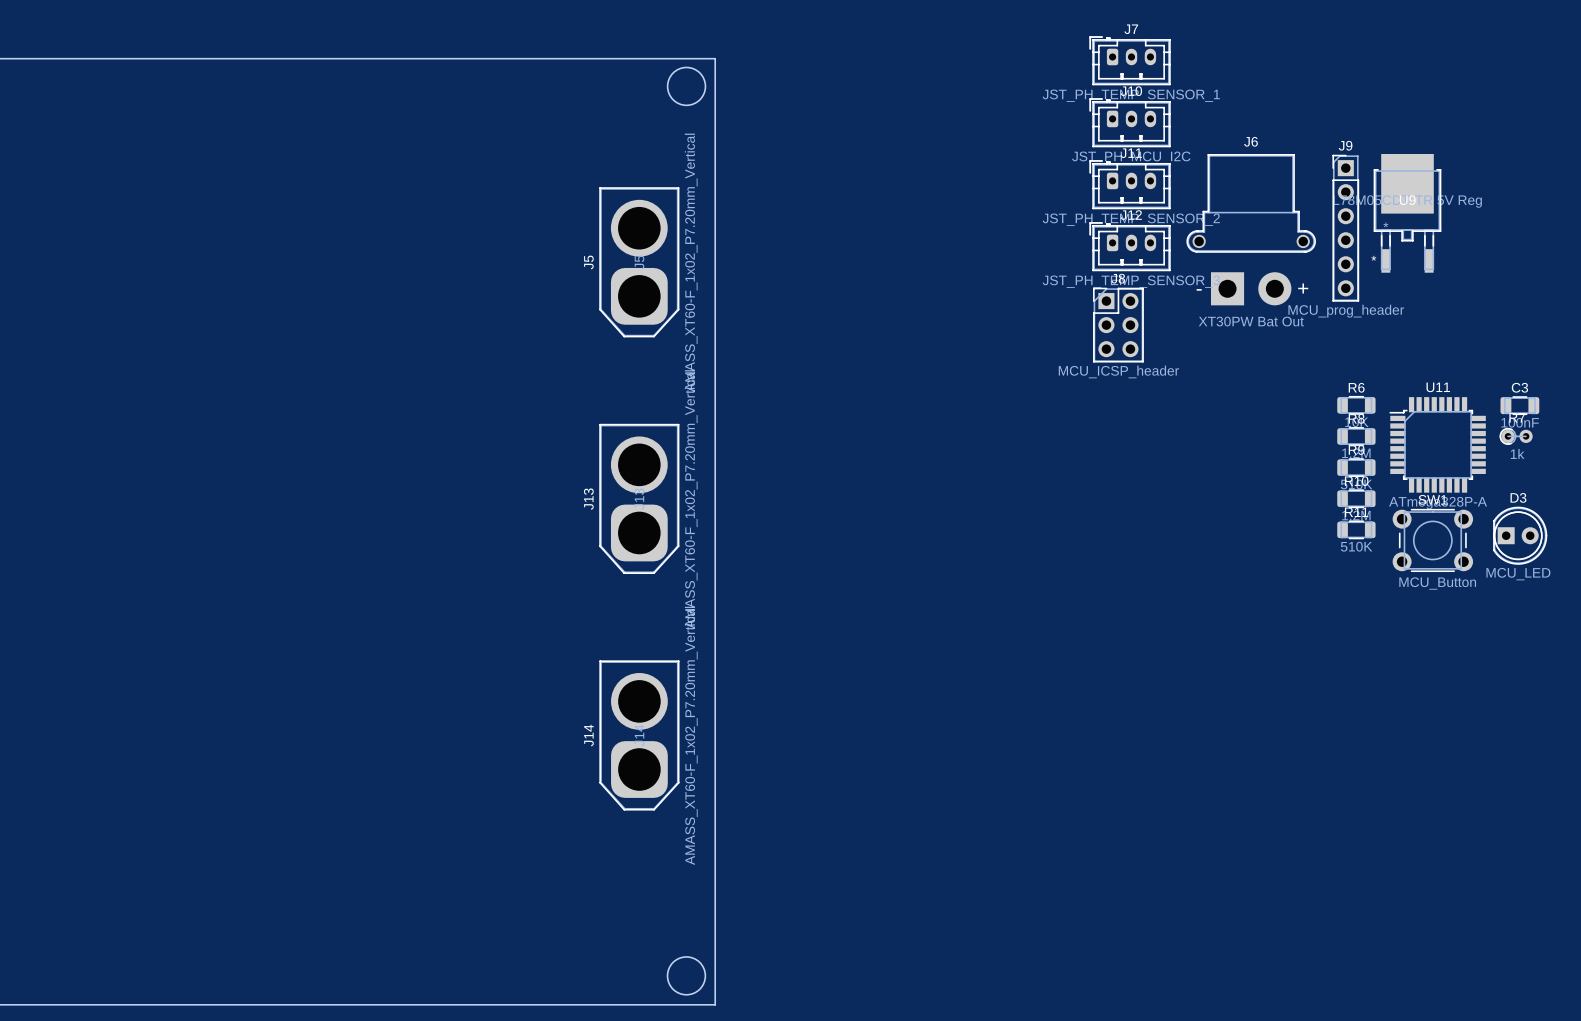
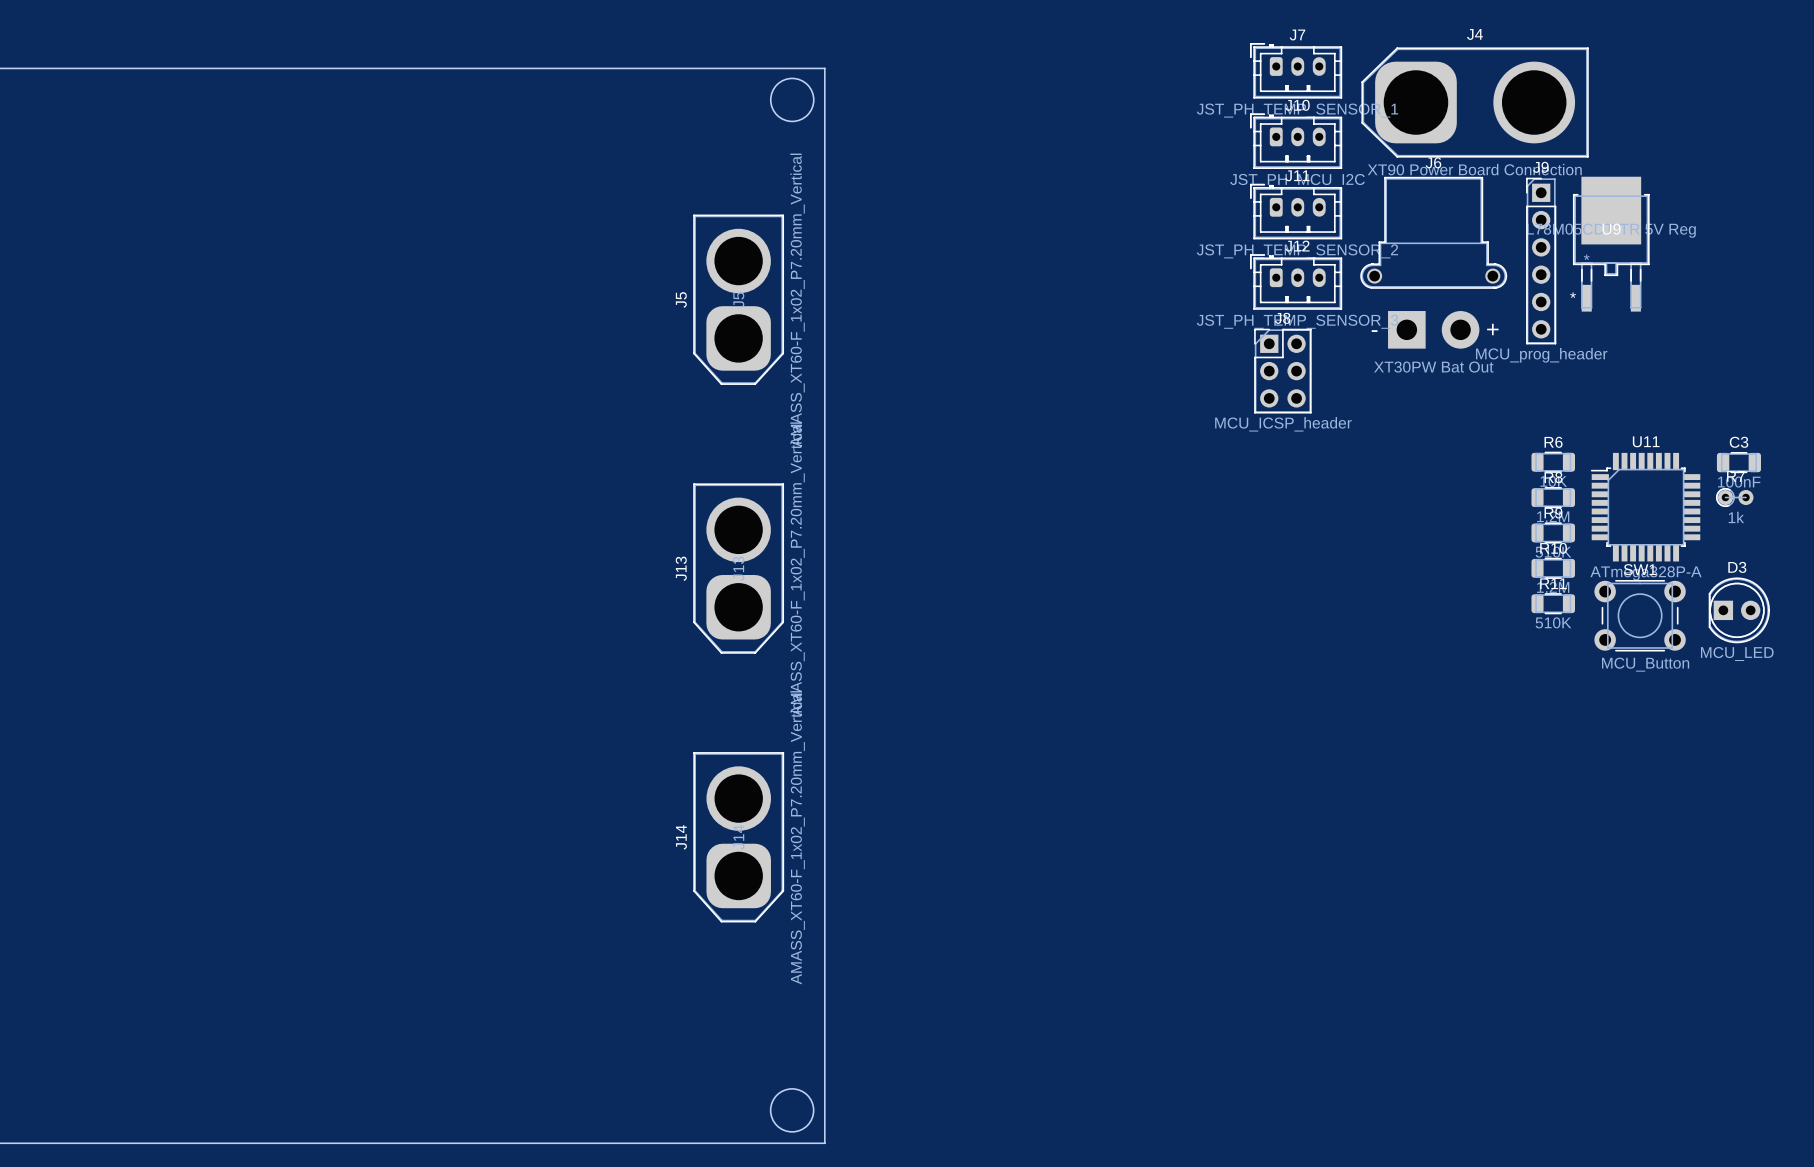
J4: none -> XT90 Power Board Connection (1475, 102)

